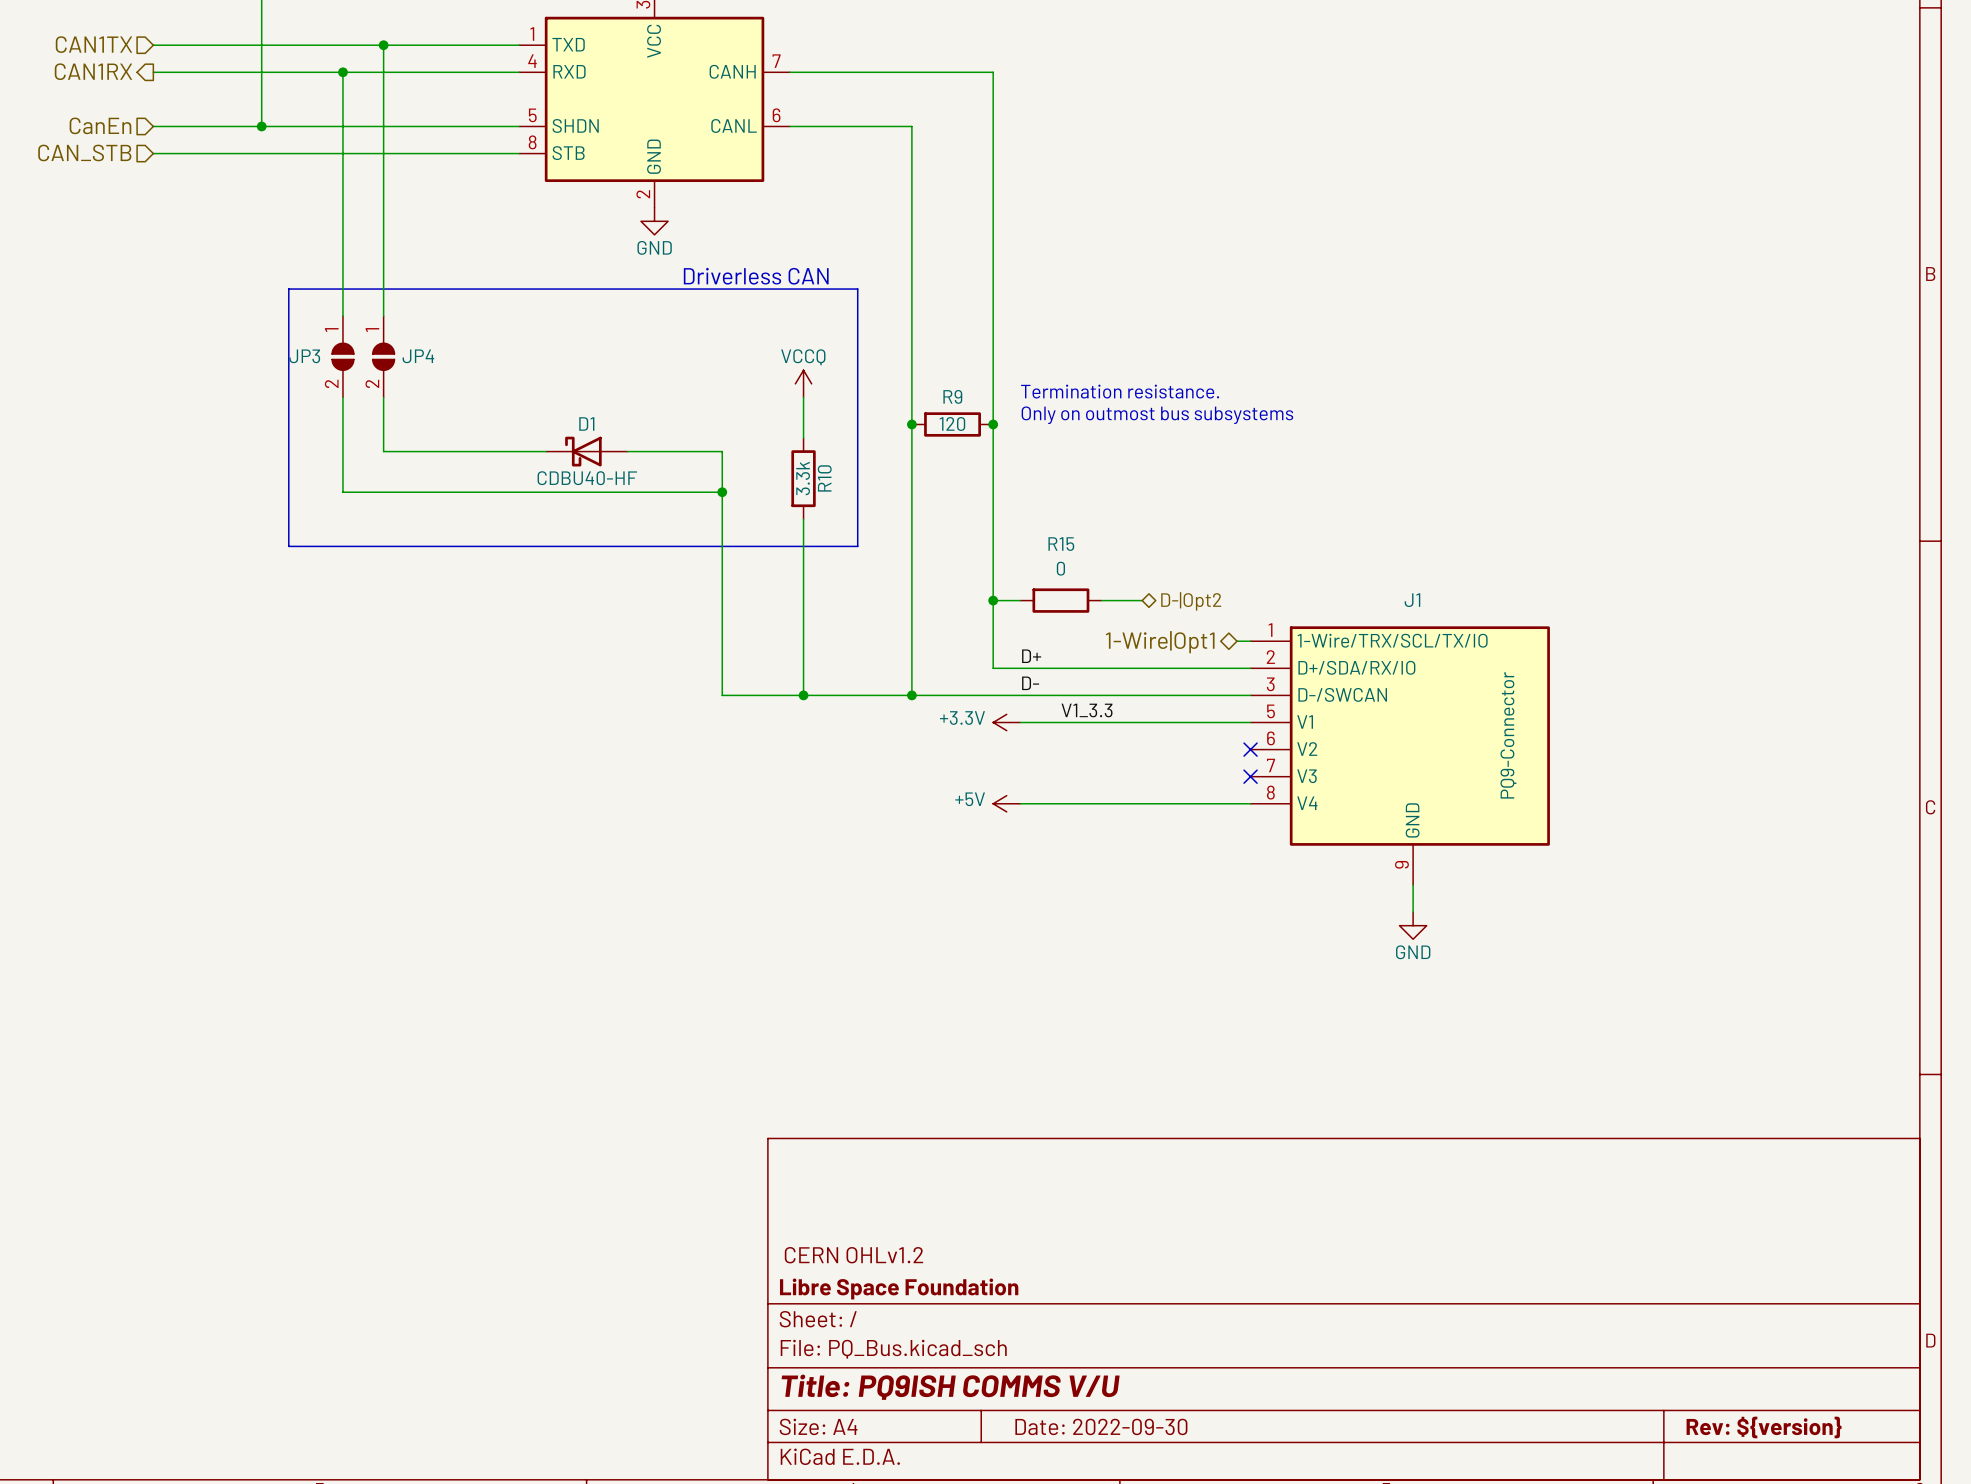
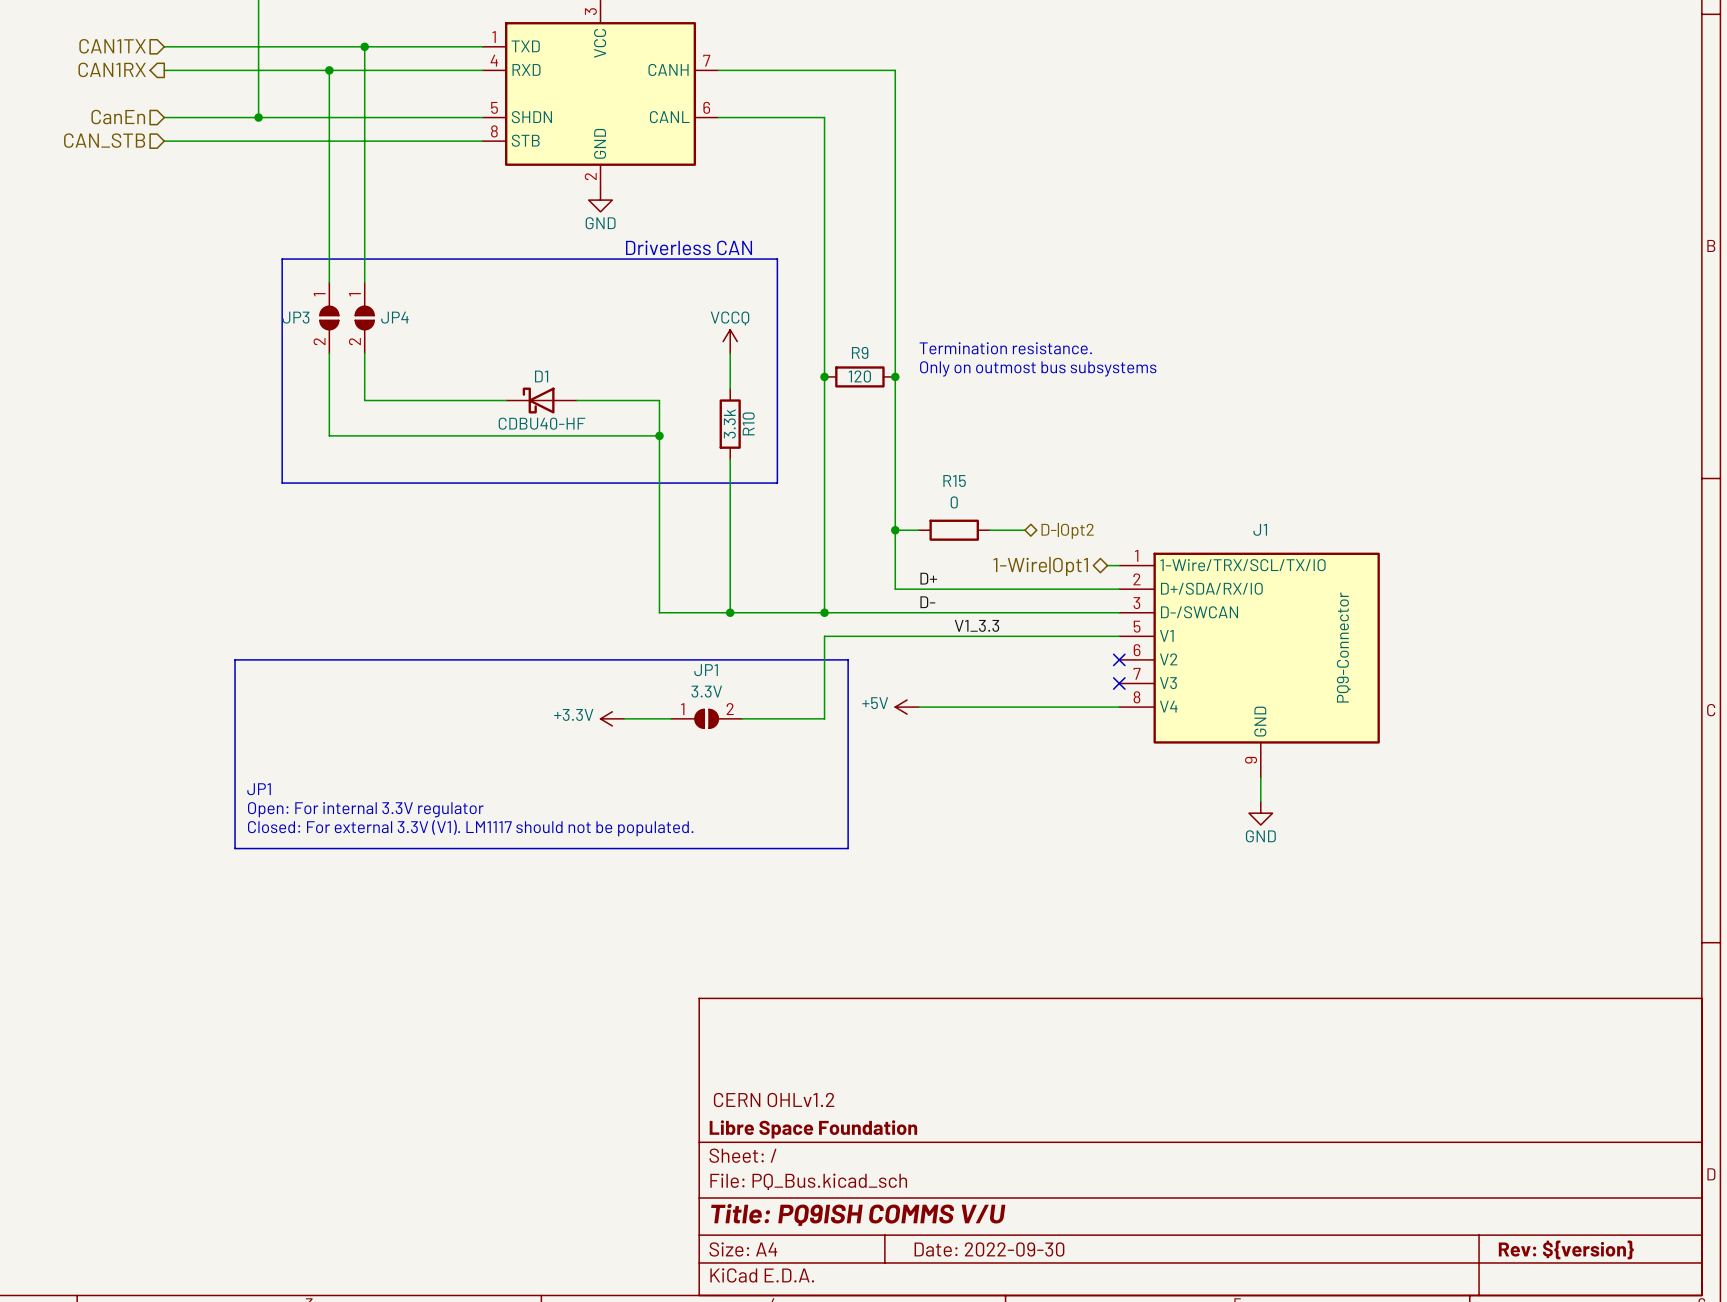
power symbol: +3.3V (1006, 722) -> none
wire: none -> (918, 636) (824, 636) (824, 718) (742, 718)
line: none -> (235, 659) (235, 848) (848, 848) (848, 659) (235, 659)
power symbol: none -> +3.3V (612, 718)
wire: none -> (624, 718) (671, 718)
JP1: none -> 3.3V (706, 718)
text: none -> JP1 (259, 789)
text: none -> Open: For internal 3.3V regulator (365, 809)
text: none -> Closed: For external 3.3V (V1). LM1117 should not be populated. (470, 828)

